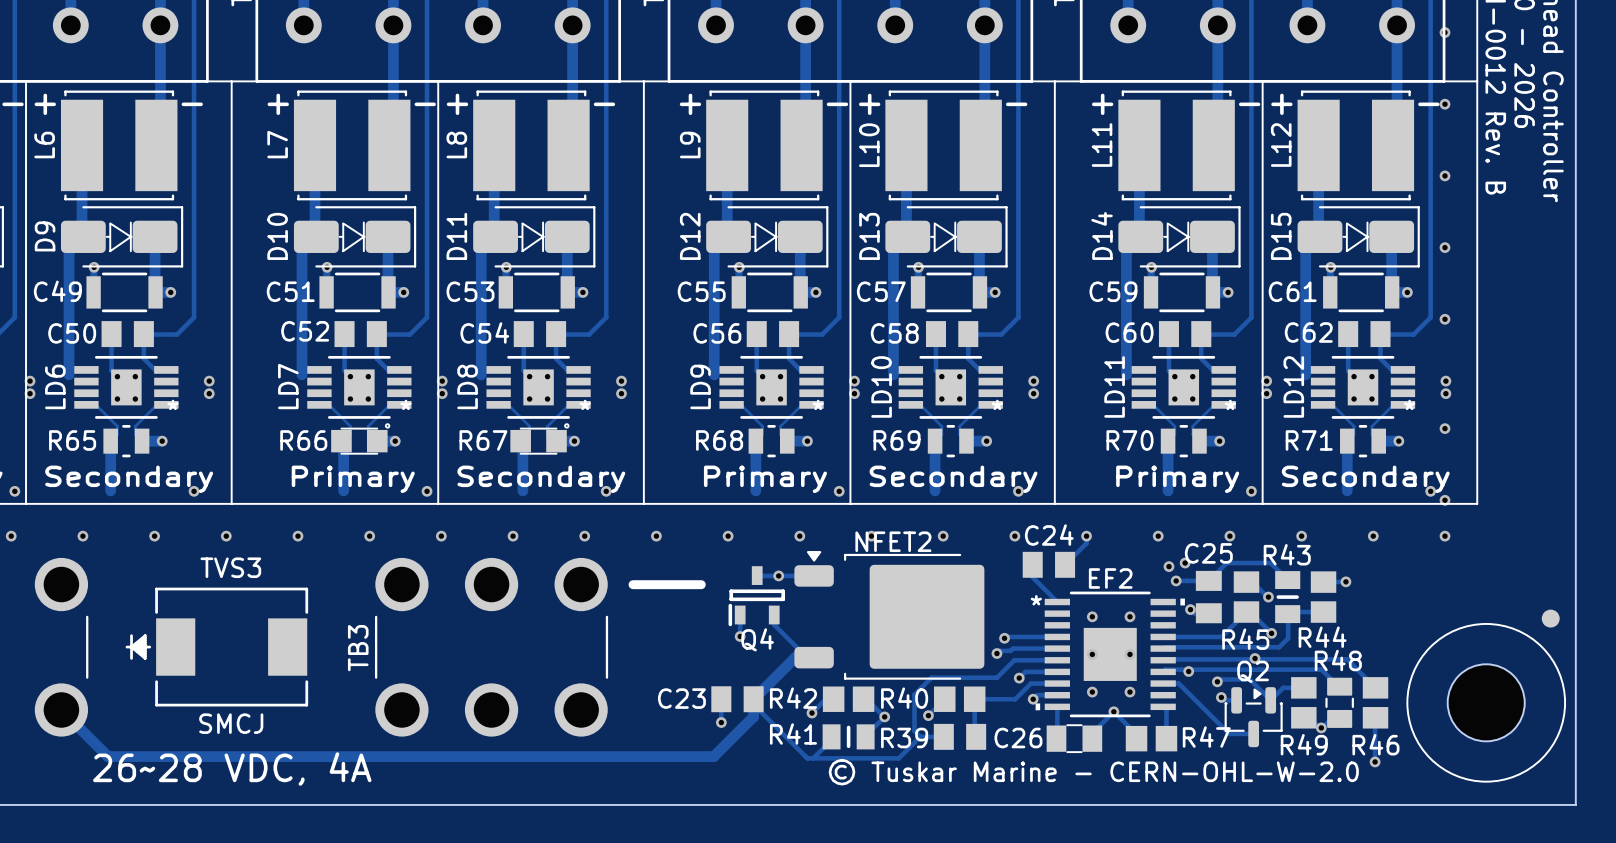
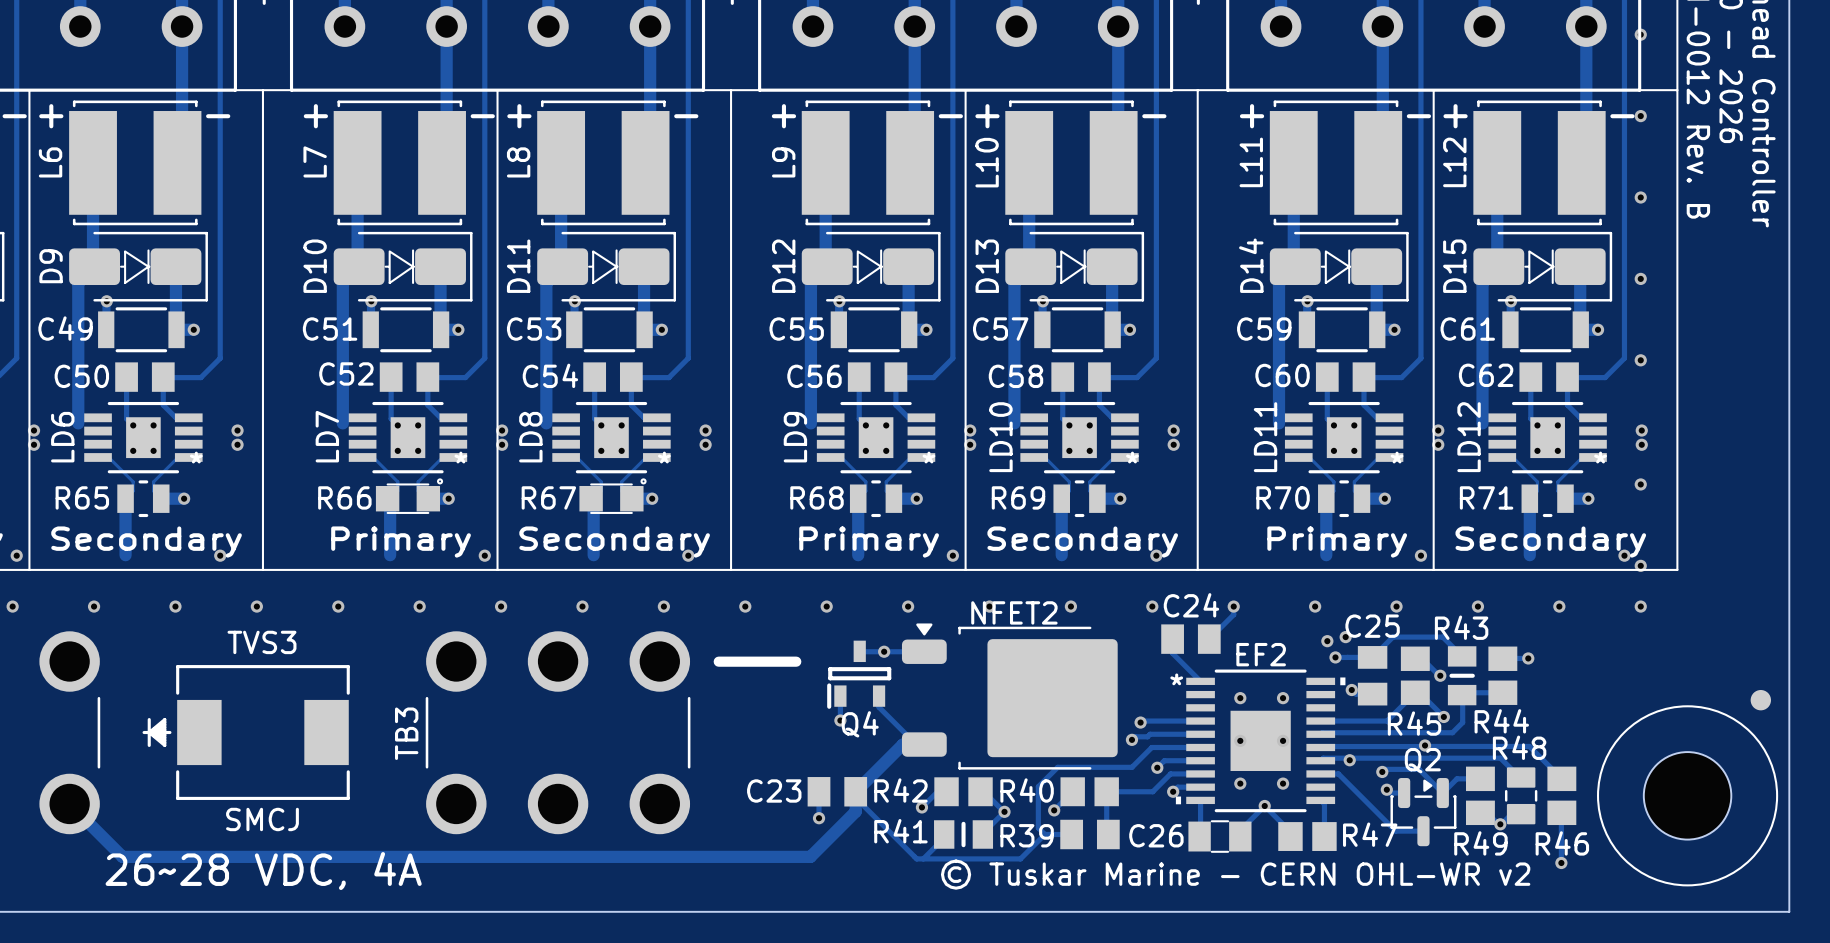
text: © Tuskar Marine - CERN-OHL-W-2.0 (1093, 772) -> © Tuskar Marine - CERN OHL-WR v2 (1235, 874)

